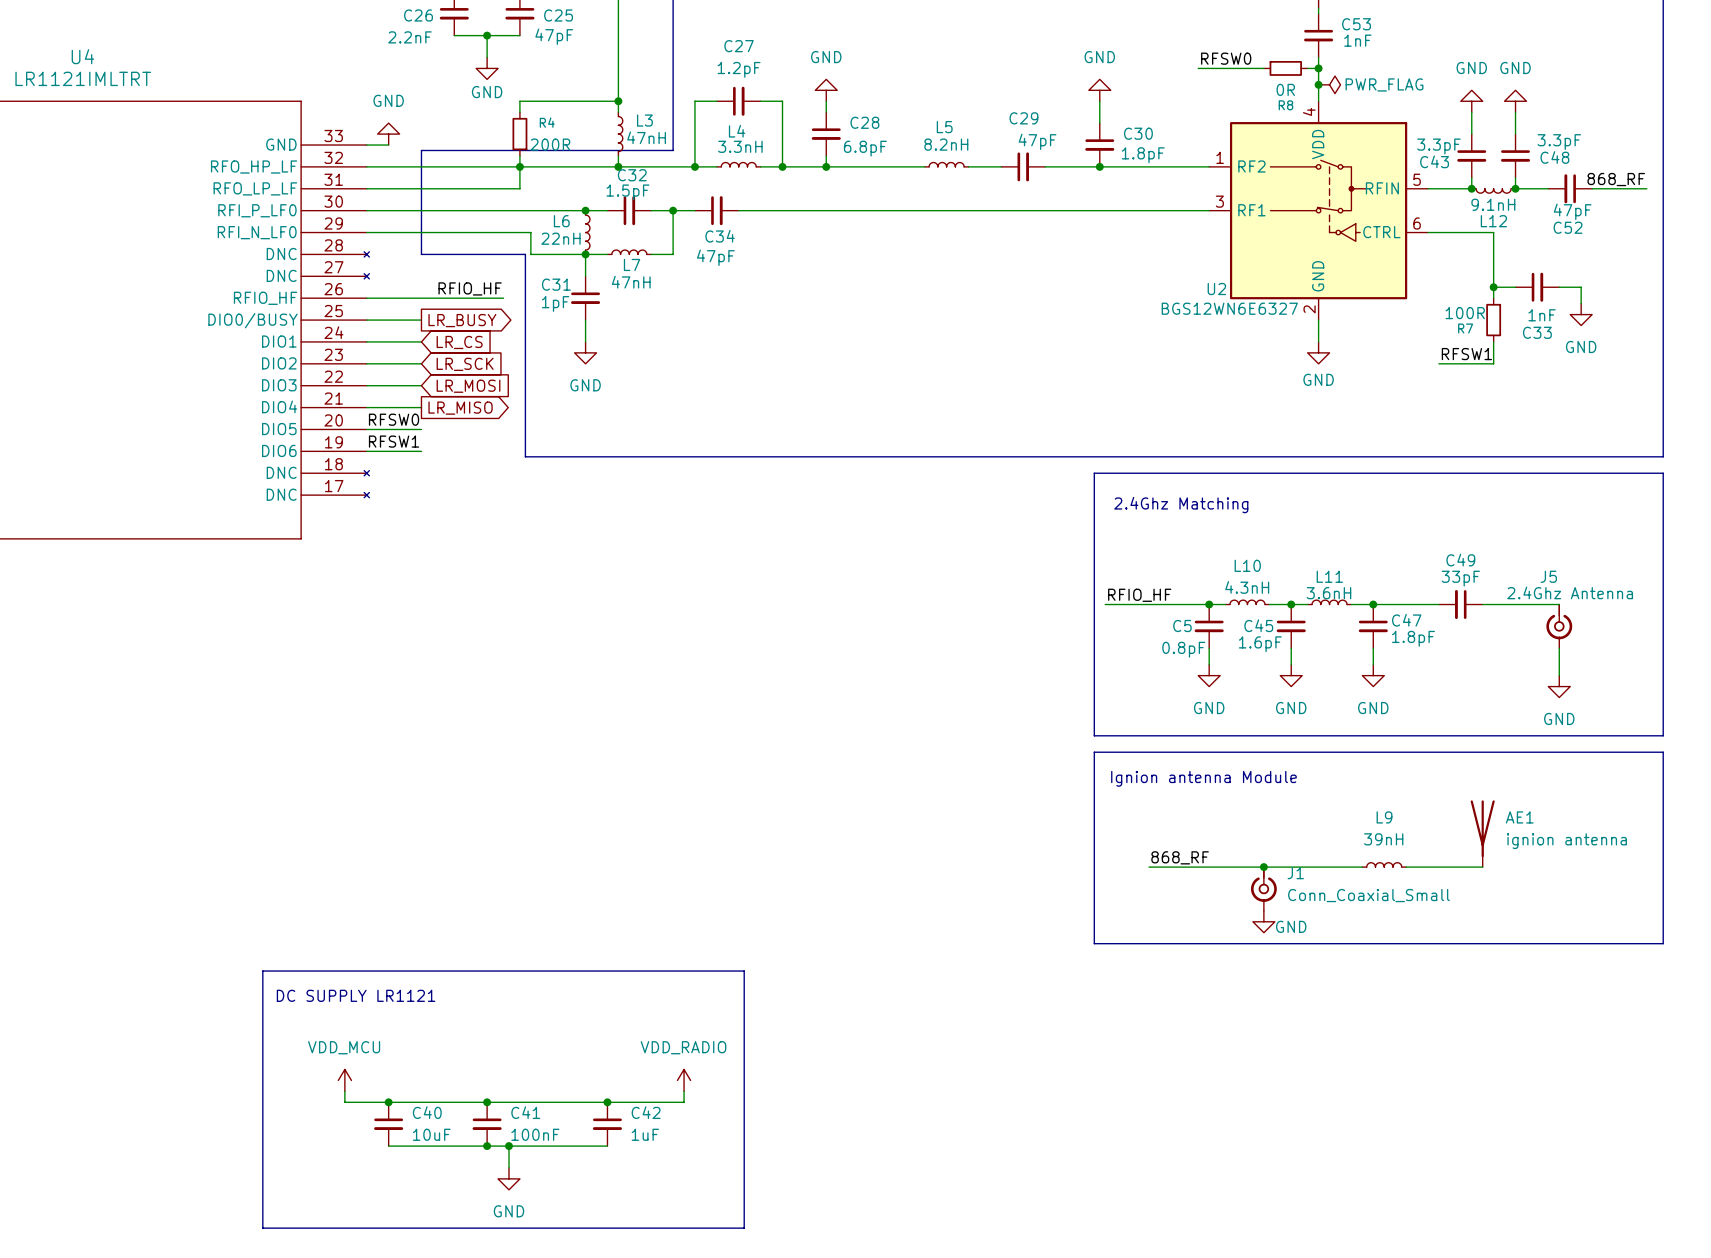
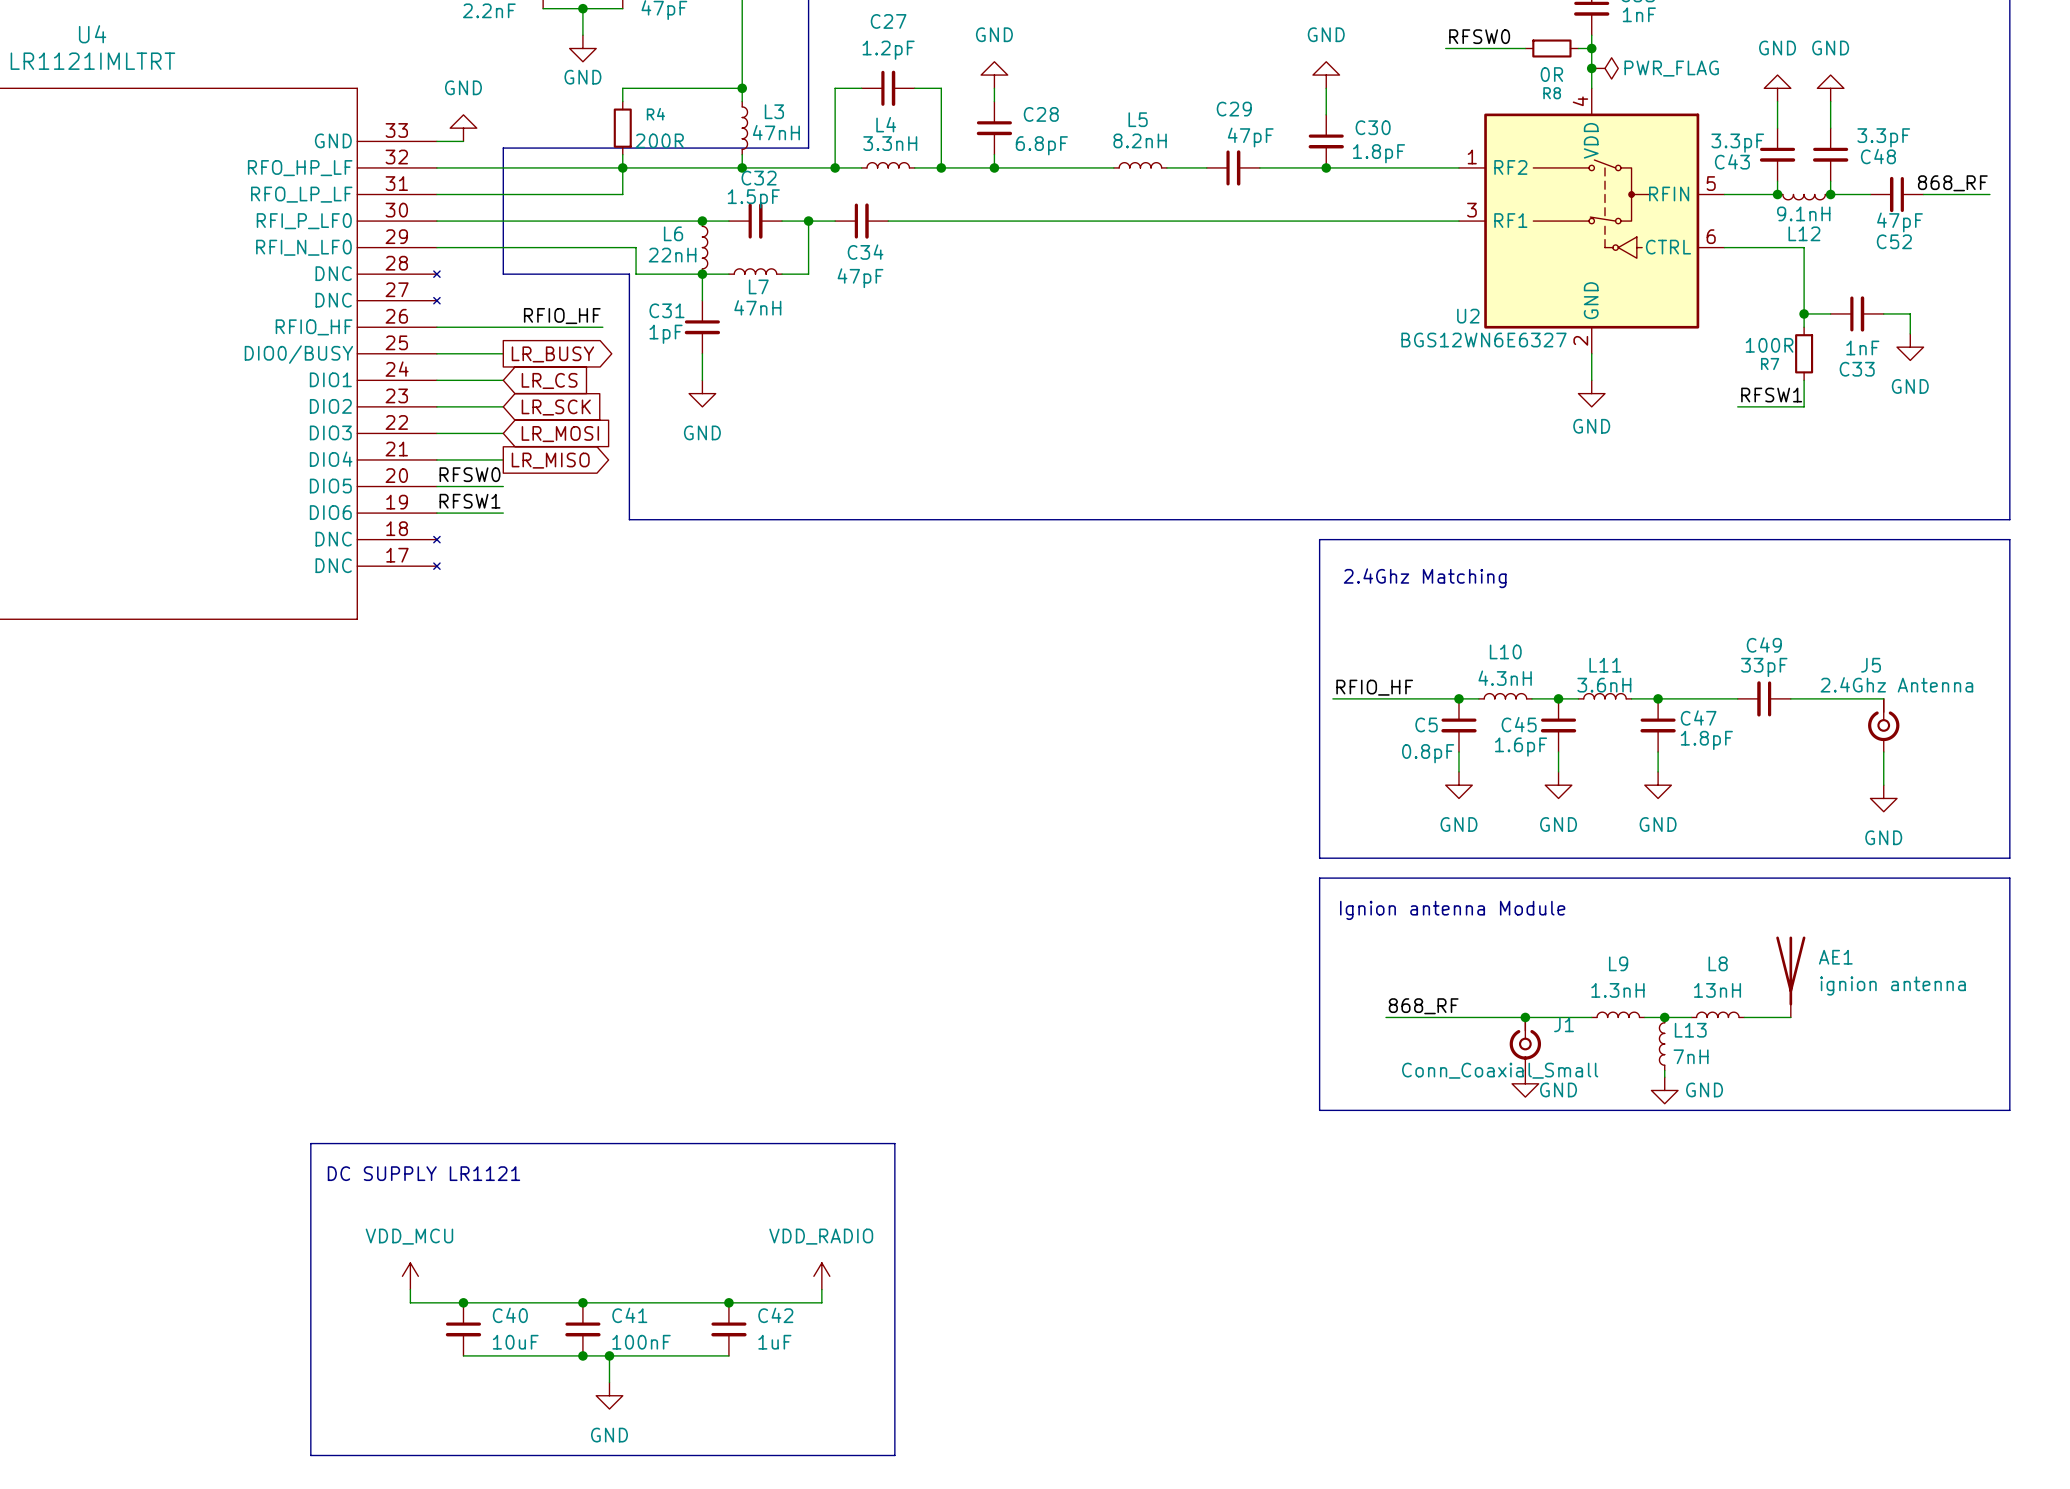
L9 name position: L9 (1384, 817) -> L9 (1618, 963)
L9 value: 39nH (1383, 839) -> 1.3nH (1617, 990)
L9 position: (1384, 864) -> (1618, 1014)
L8: none -> 13nH (1717, 1014)
wire: (1318, 867) (1362, 867) -> (1691, 1017) (1644, 1017)
junction: none -> (1664, 1017)
wire: (1406, 867) (1444, 867) -> none
L13: none -> 7nH (1662, 1044)
J1 value position: Conn_Coaxial_Small (1368, 895) -> Conn_Coaxial_Small (1500, 1070)
wire: none -> (1664, 1070) (1664, 1077)
power symbol: none -> GND (1664, 1090)

